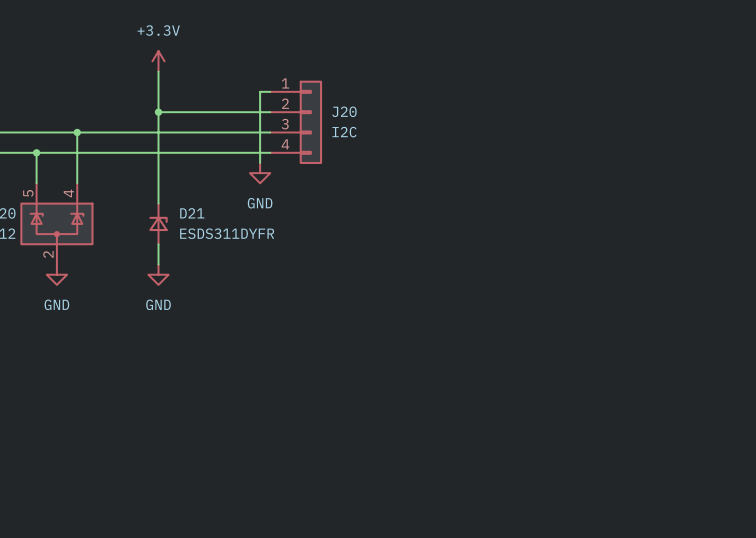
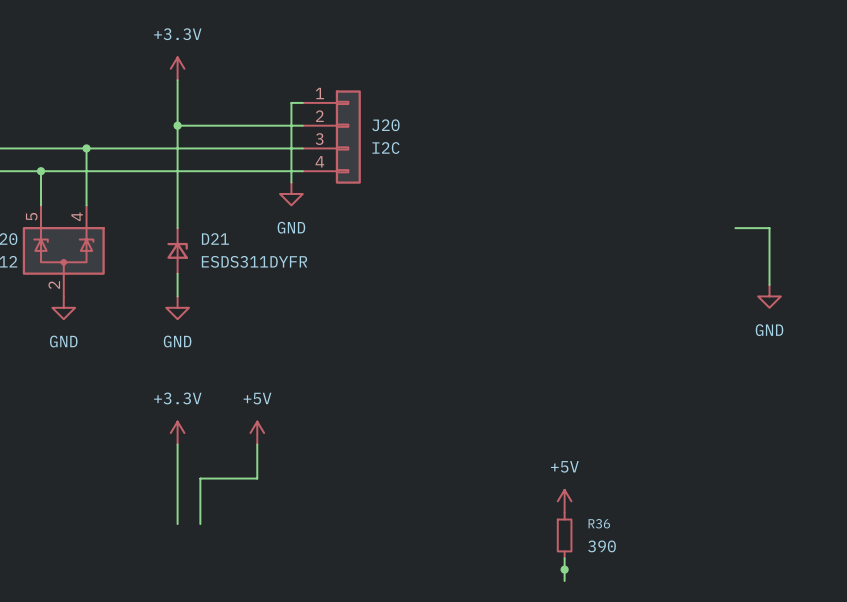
wire: none -> (735, 228) (769, 228) (769, 285)
power symbol: none -> GND (769, 296)
power symbol: none -> +3.3V (177, 433)
power symbol: none -> +5V (257, 433)
wire: none -> (177, 444) (177, 524)
wire: none -> (257, 444) (257, 478) (200, 478) (200, 524)
power symbol: none -> +5V (564, 501)
R36: none -> 390 (564, 535)
wire: none -> (564, 558) (564, 581)
junction: none -> (564, 569)

